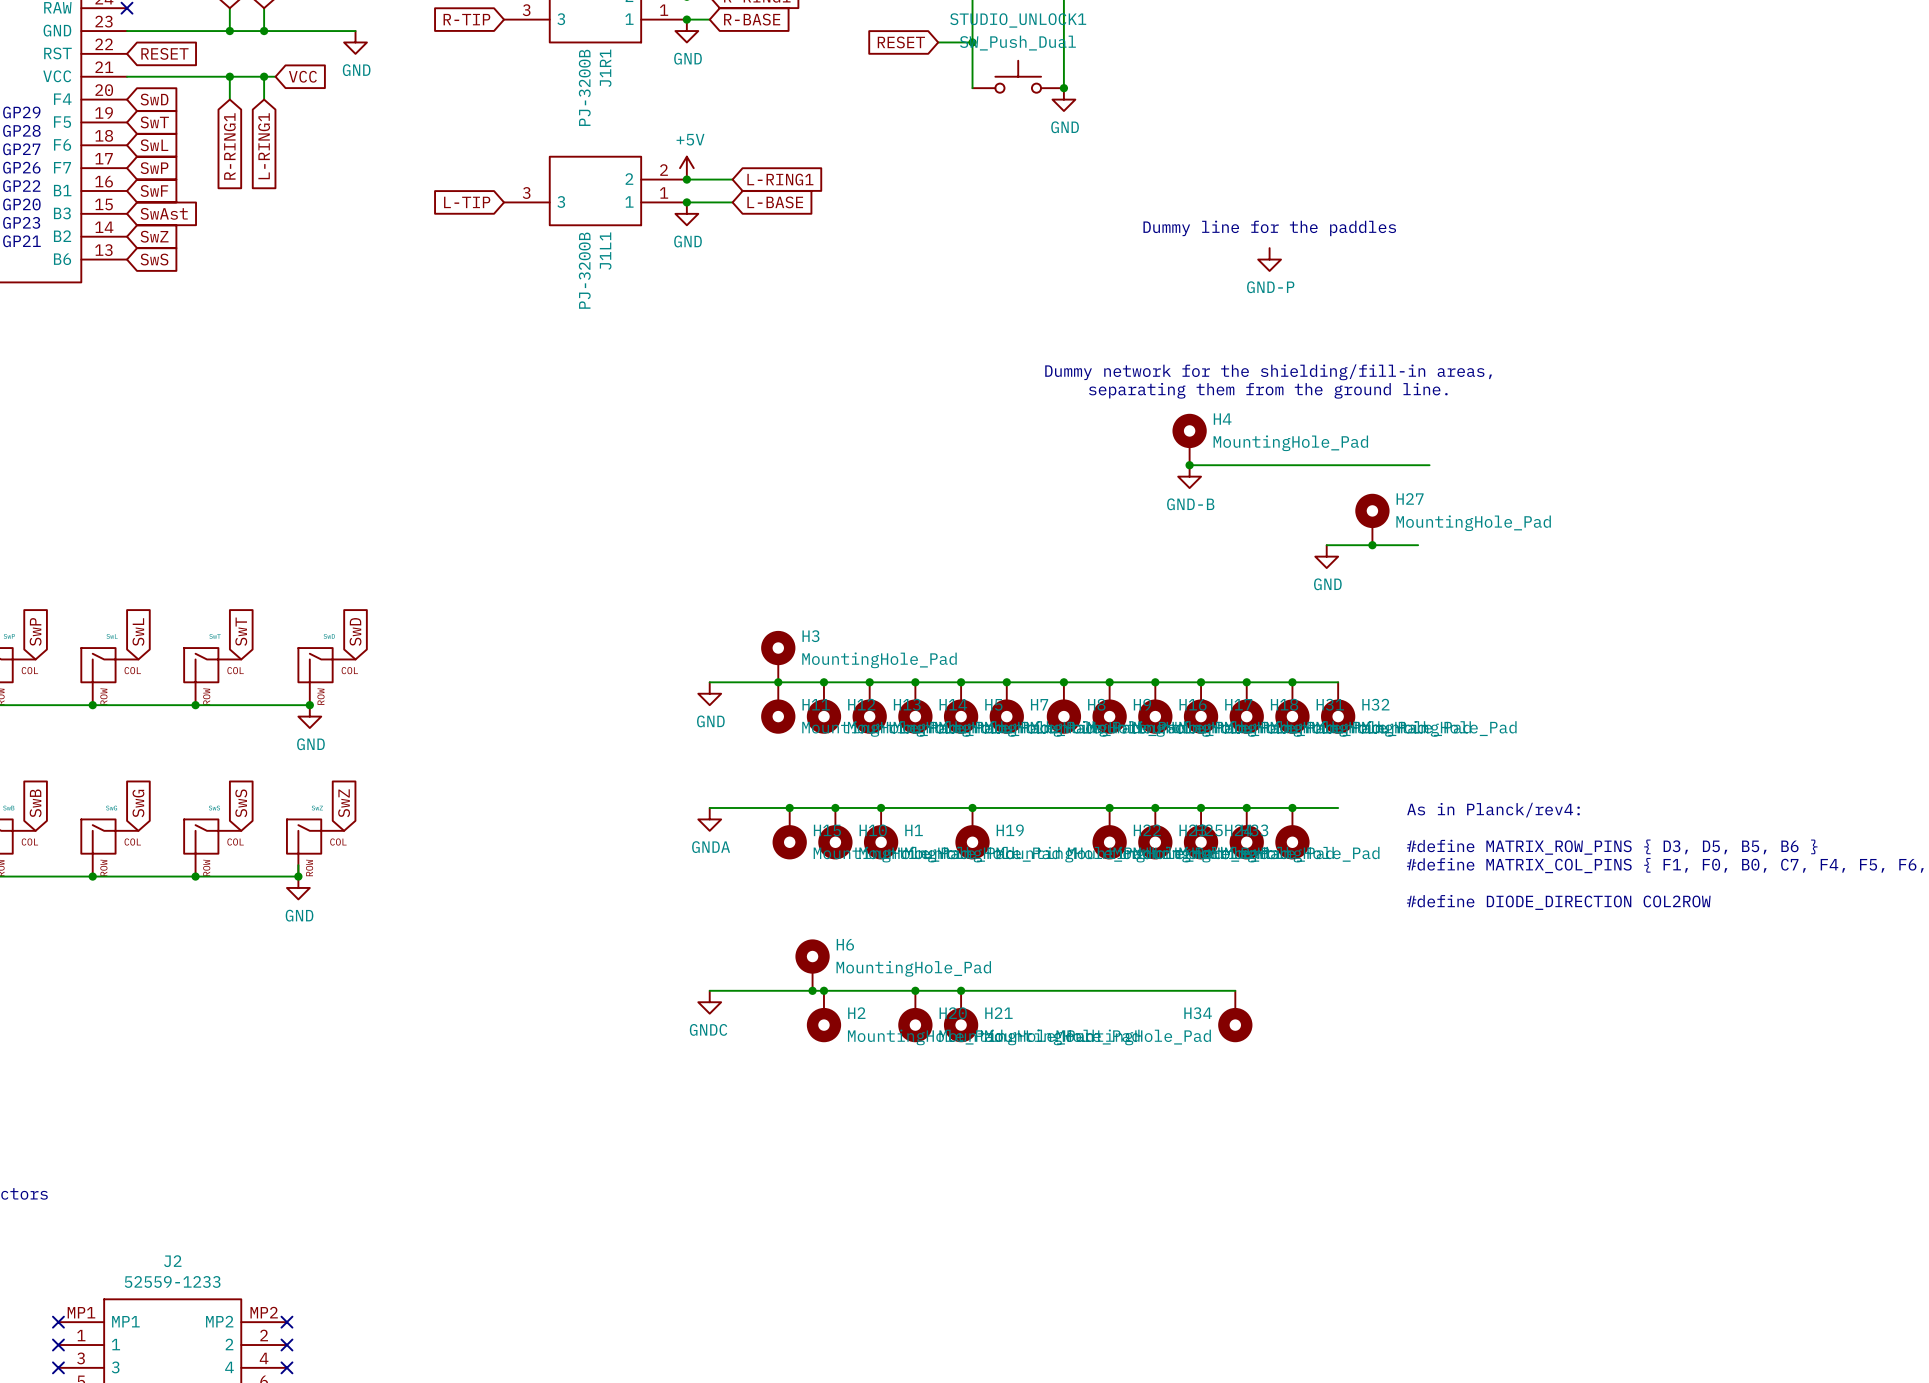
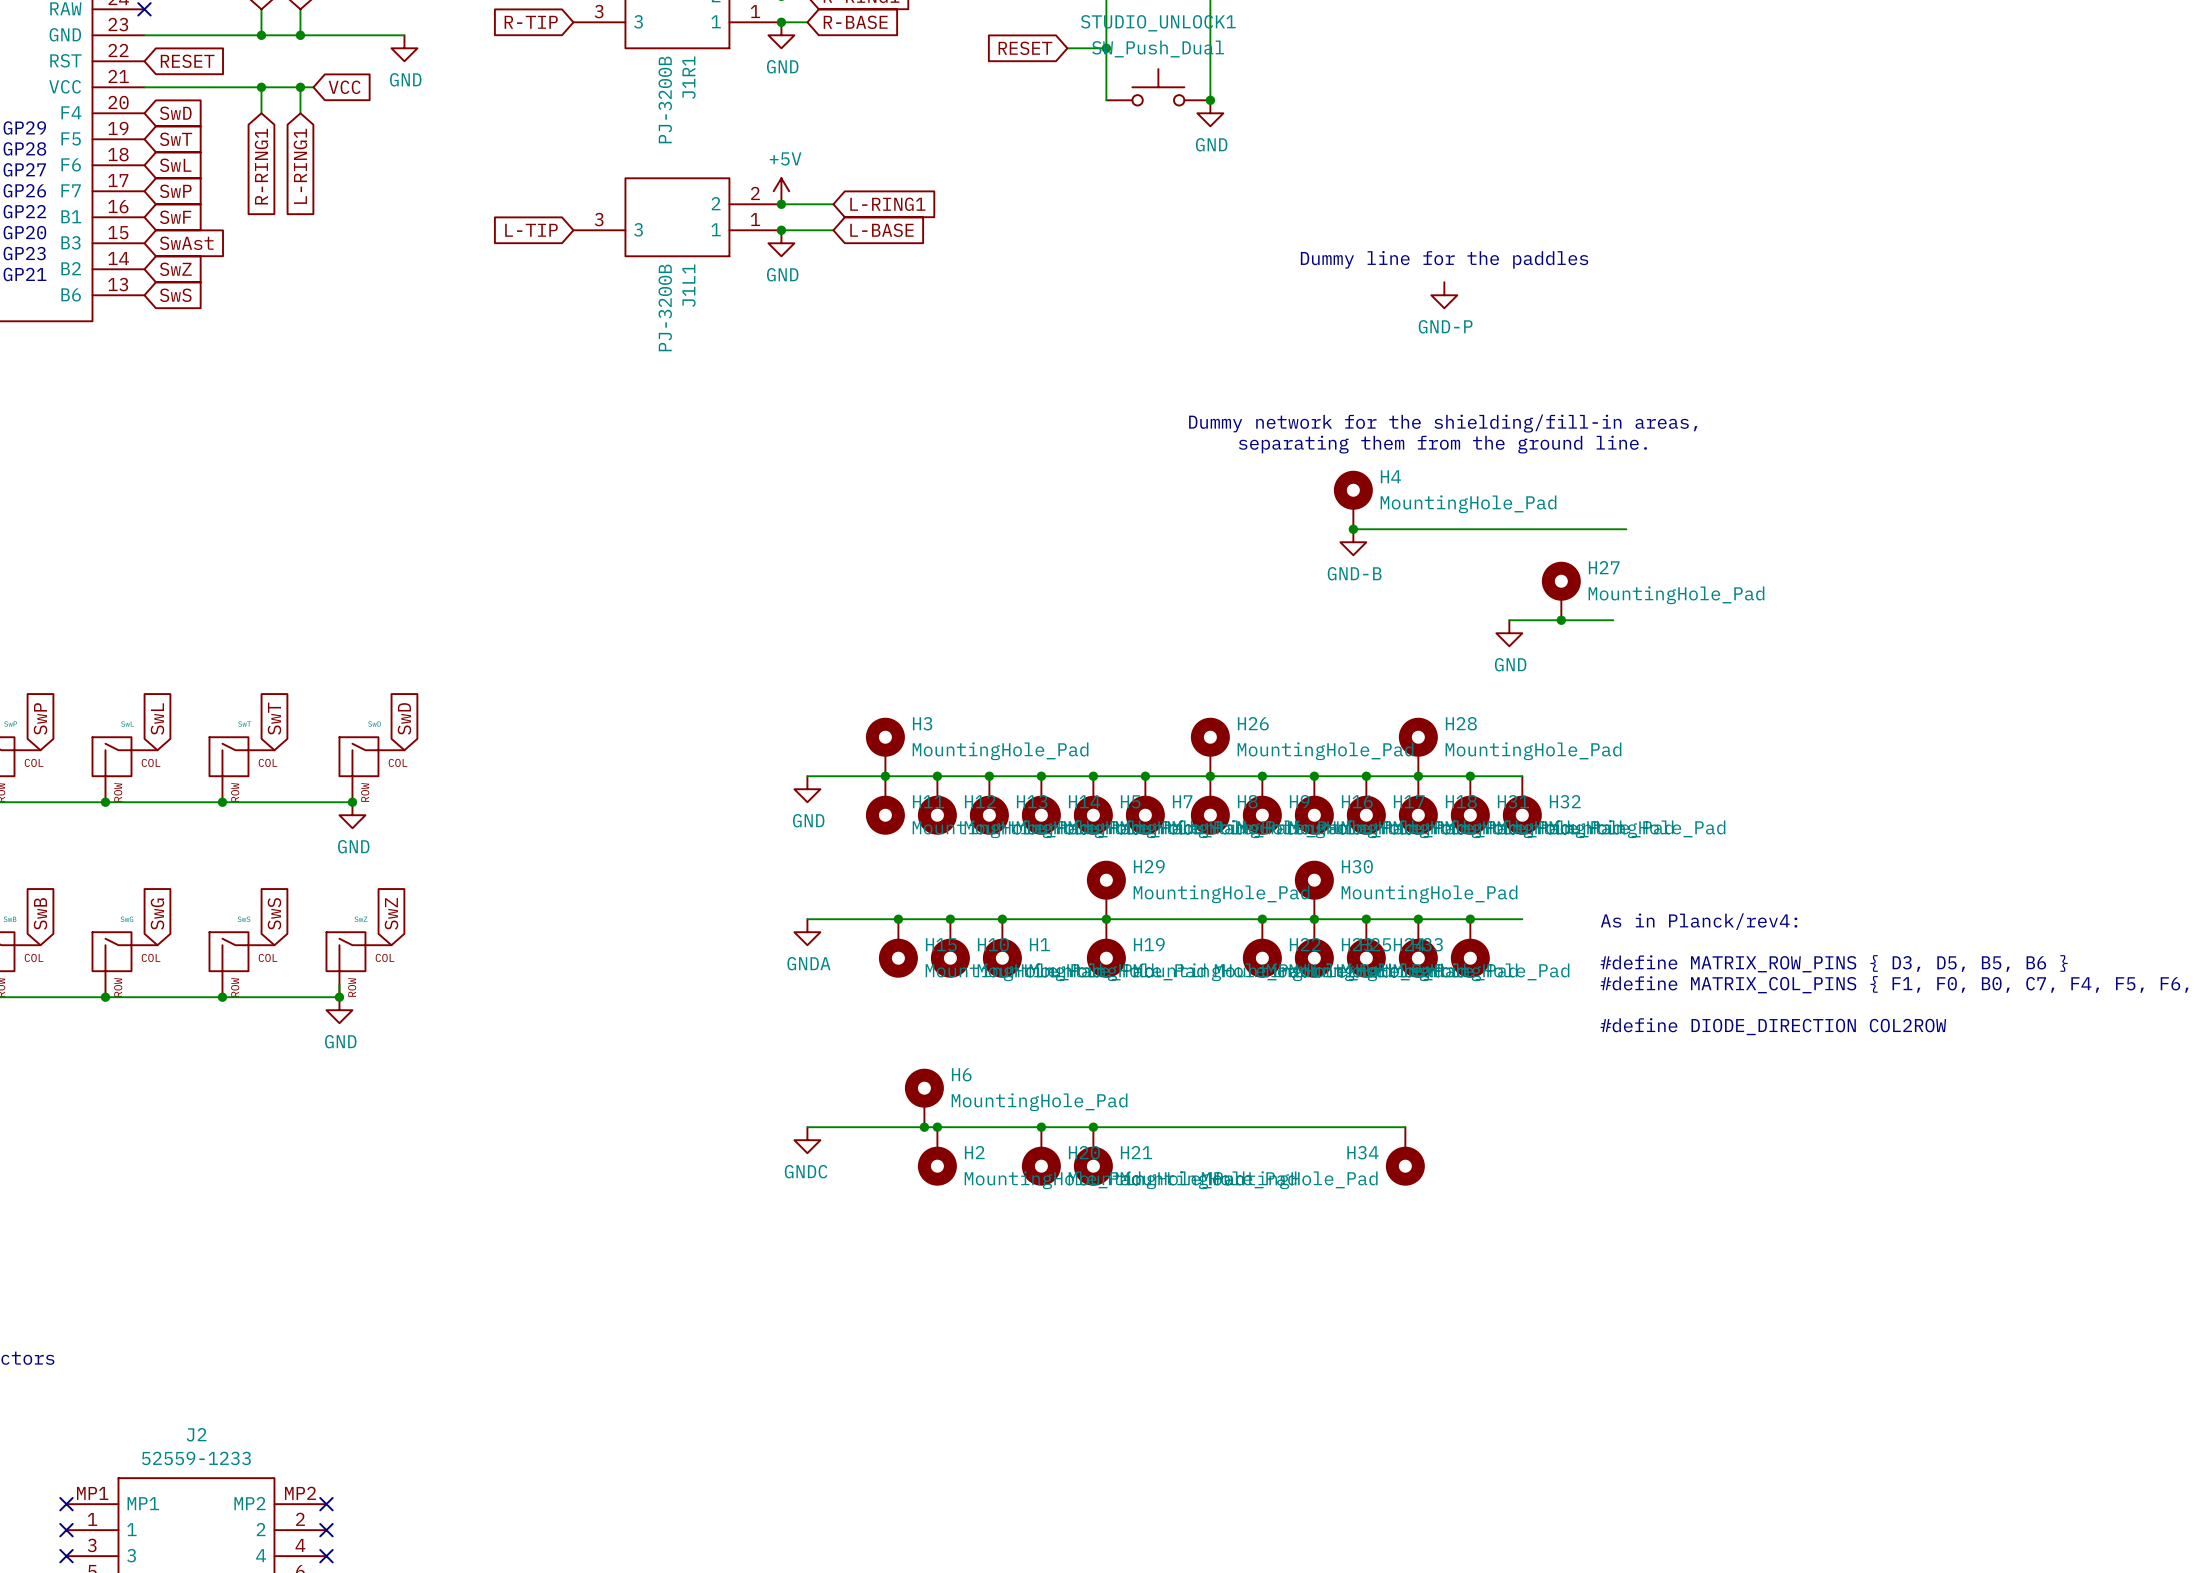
H26: none -> MountingHole_Pad (1210, 746)
H28: none -> MountingHole_Pad (1418, 746)
H29: none -> MountingHole_Pad (1106, 889)
H30: none -> MountingHole_Pad (1314, 889)

